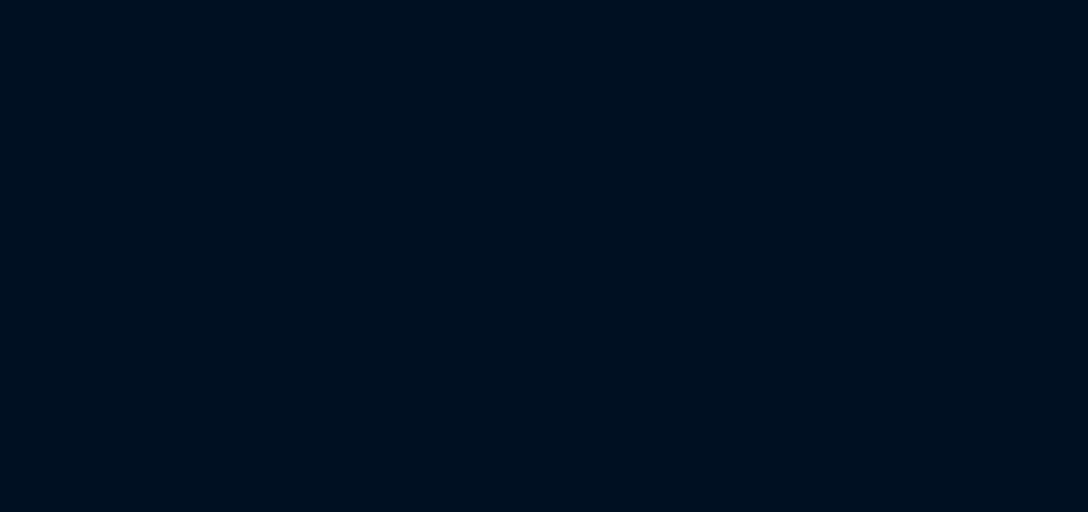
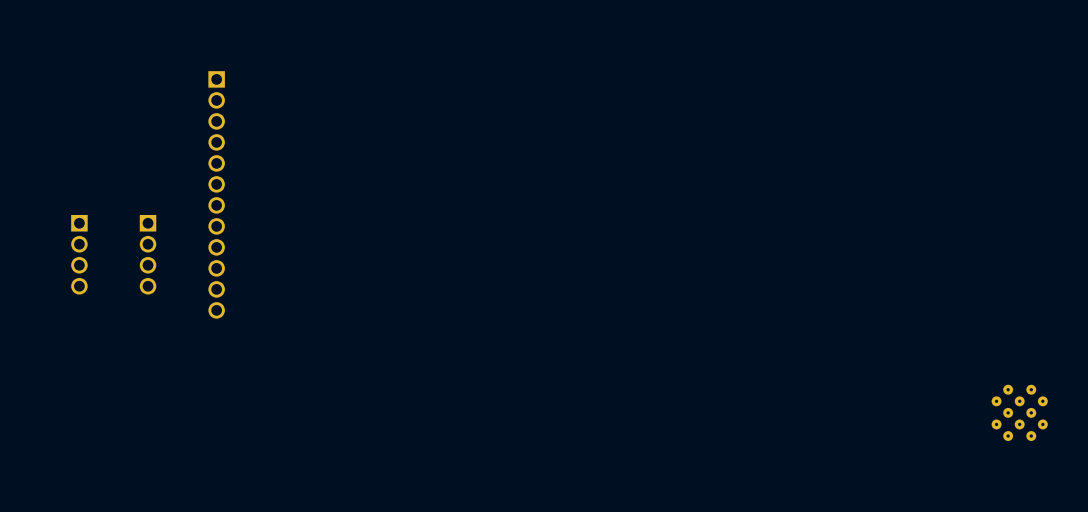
part: none -> (216, 194)
part: none -> (79, 254)
part: none -> (148, 254)
part: none -> (1019, 412)

